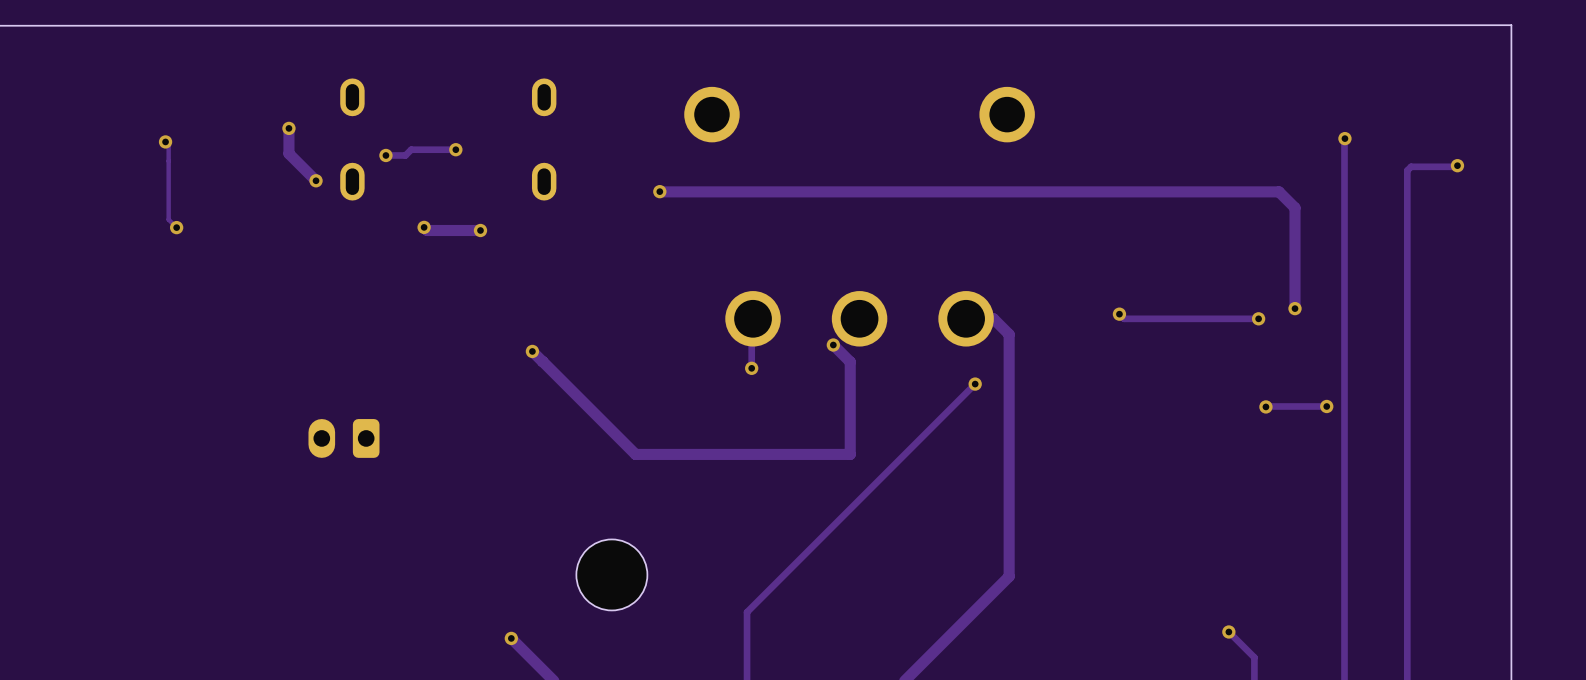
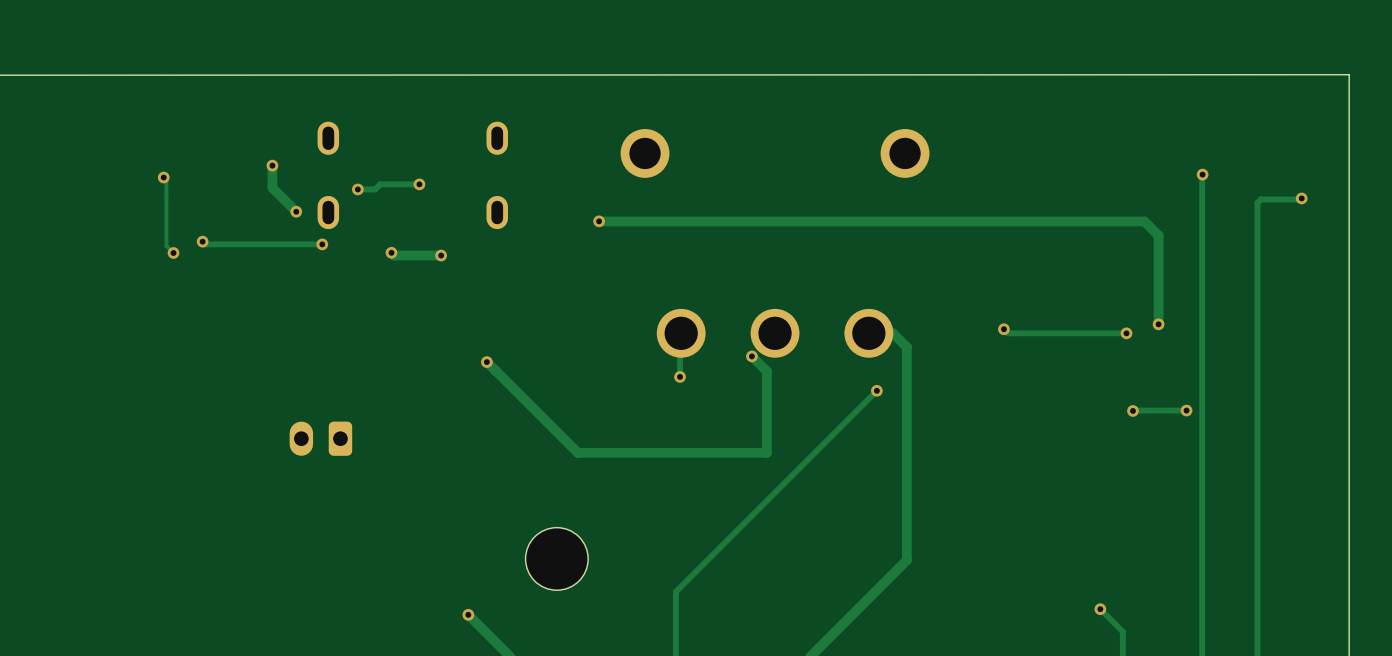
track: none -> (202, 241) (205, 244) (322, 244)
via: none -> (202, 241)
via: none -> (322, 244)

